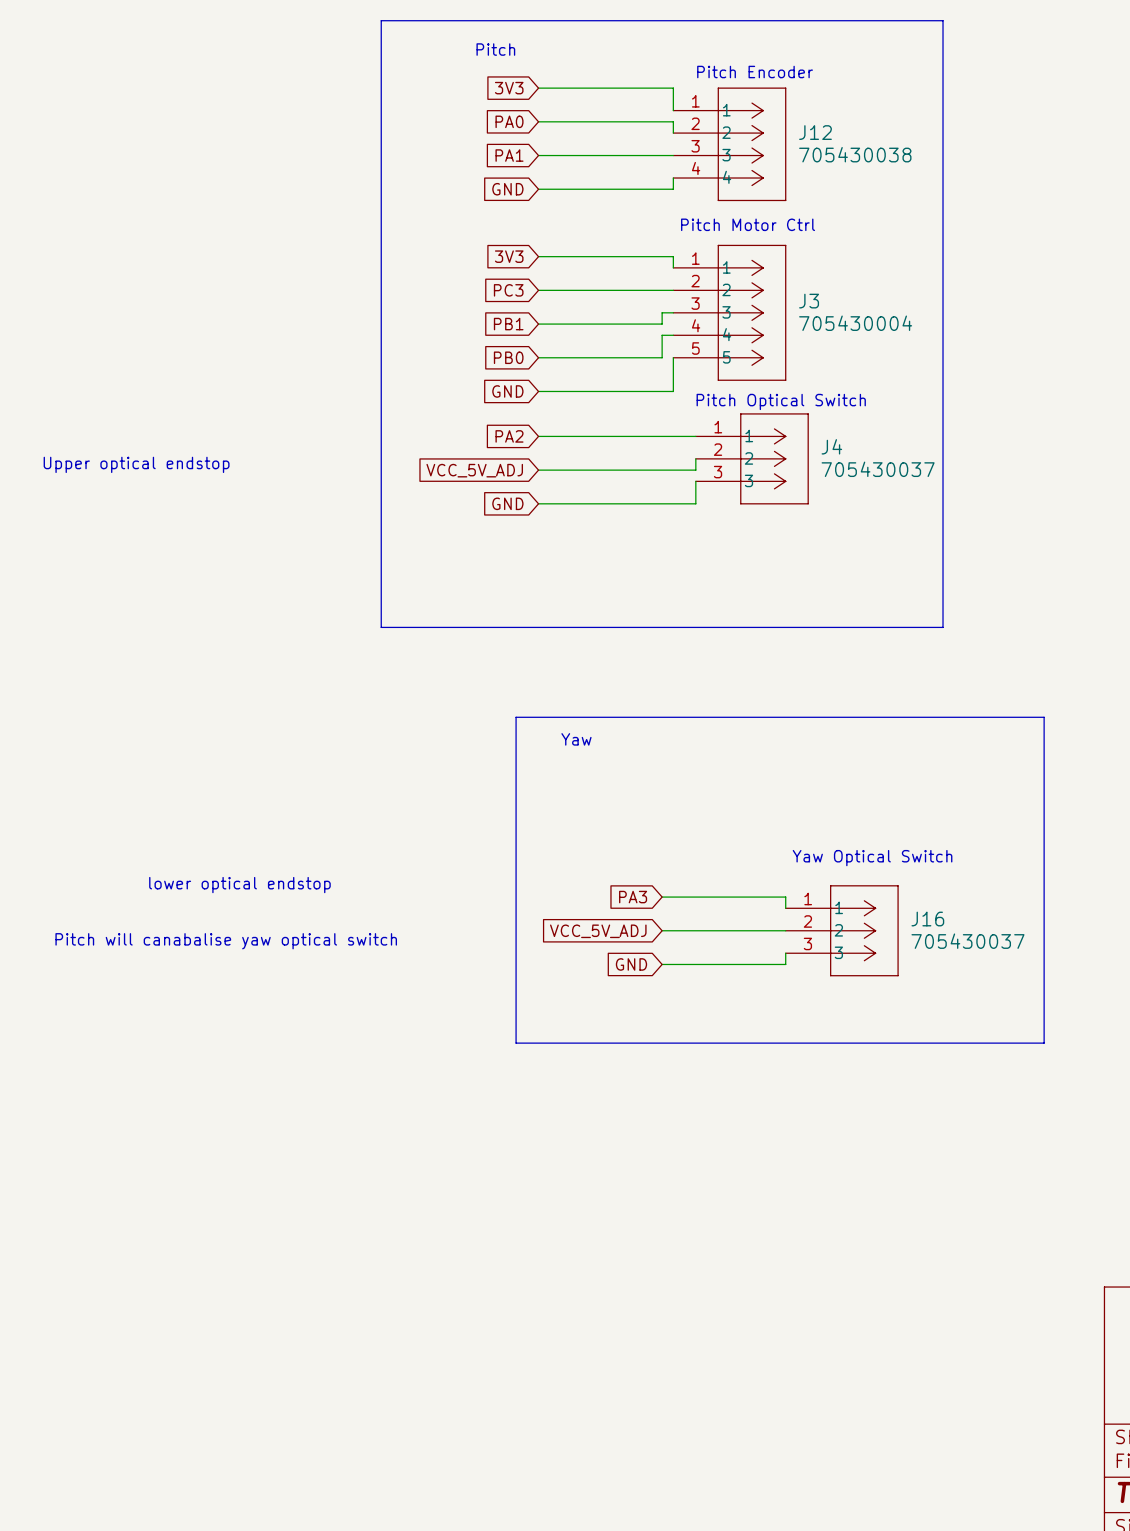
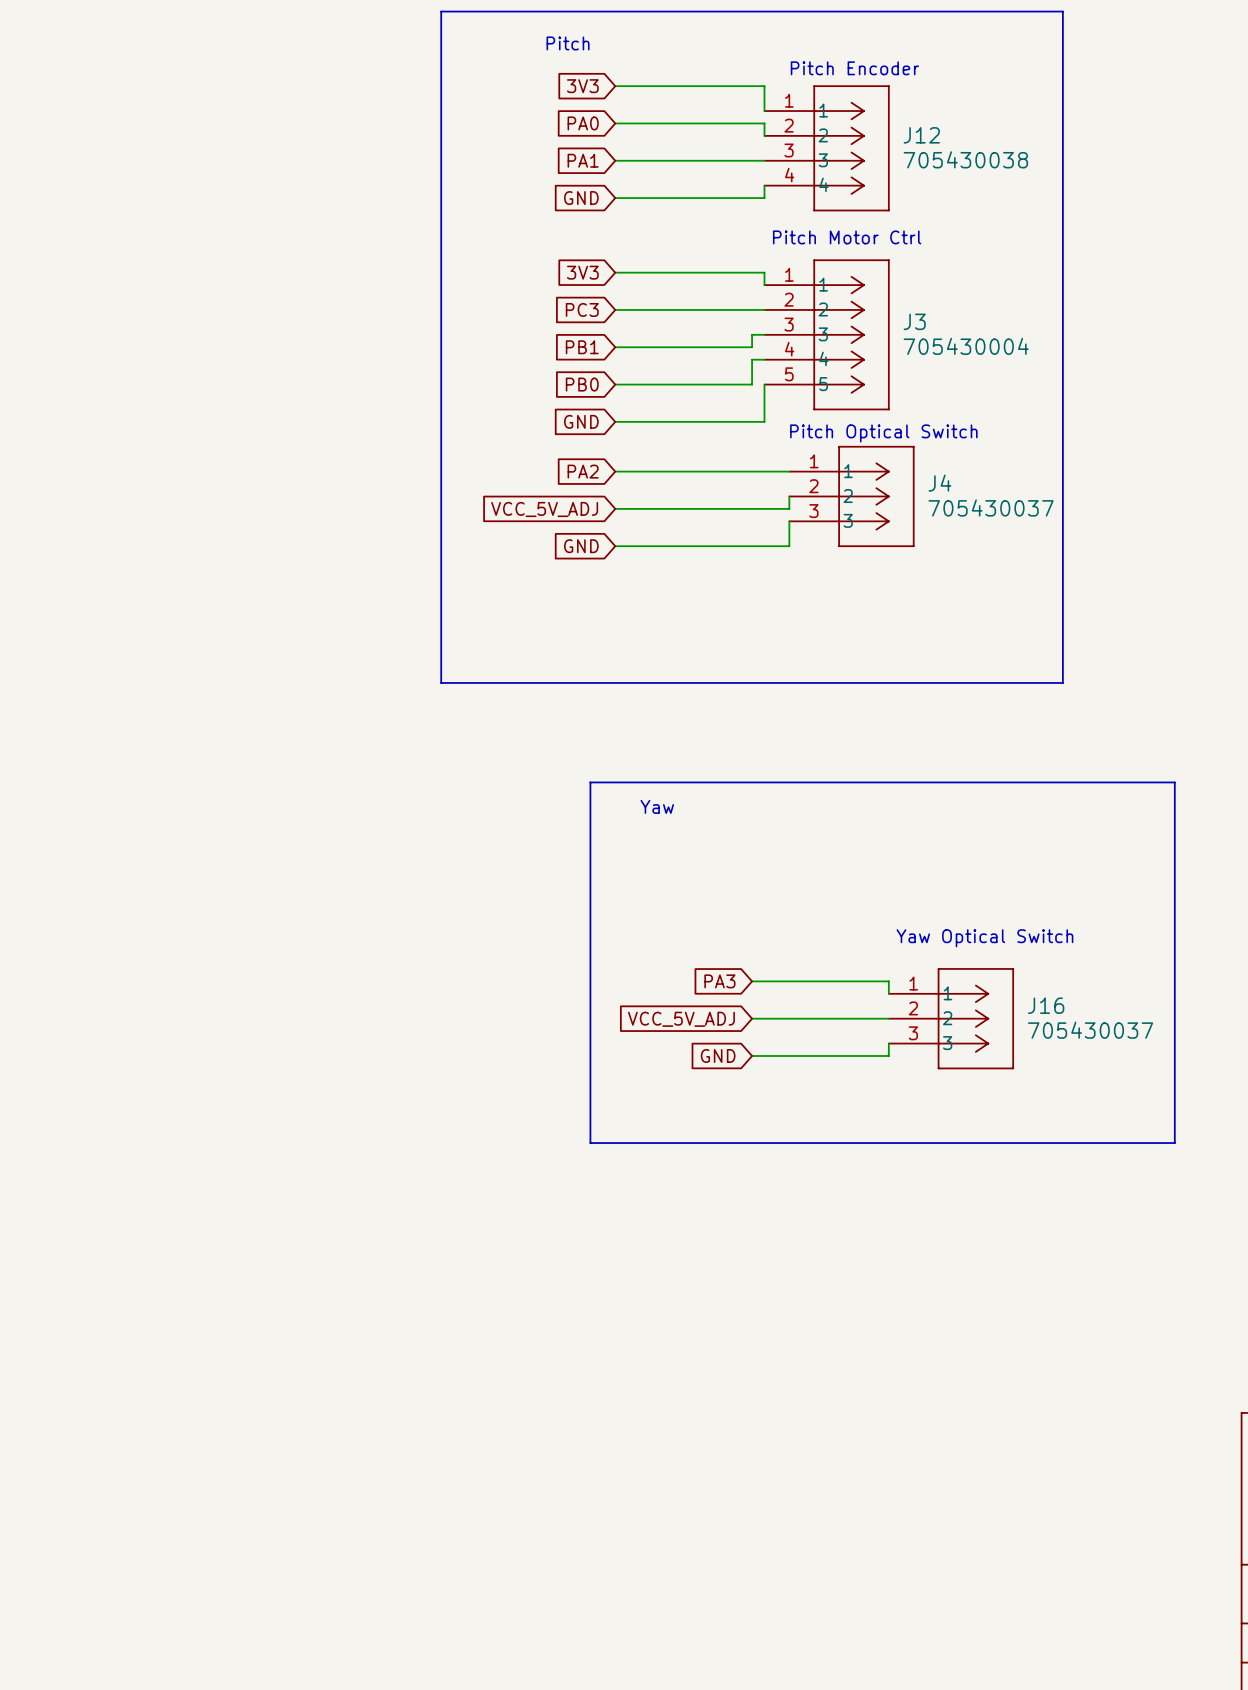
text: Upper optical endstop (136, 464) -> none
text: lower optical endstop (239, 885) -> none
text: Pitch will canabalise yaw optical switch (226, 941) -> none

